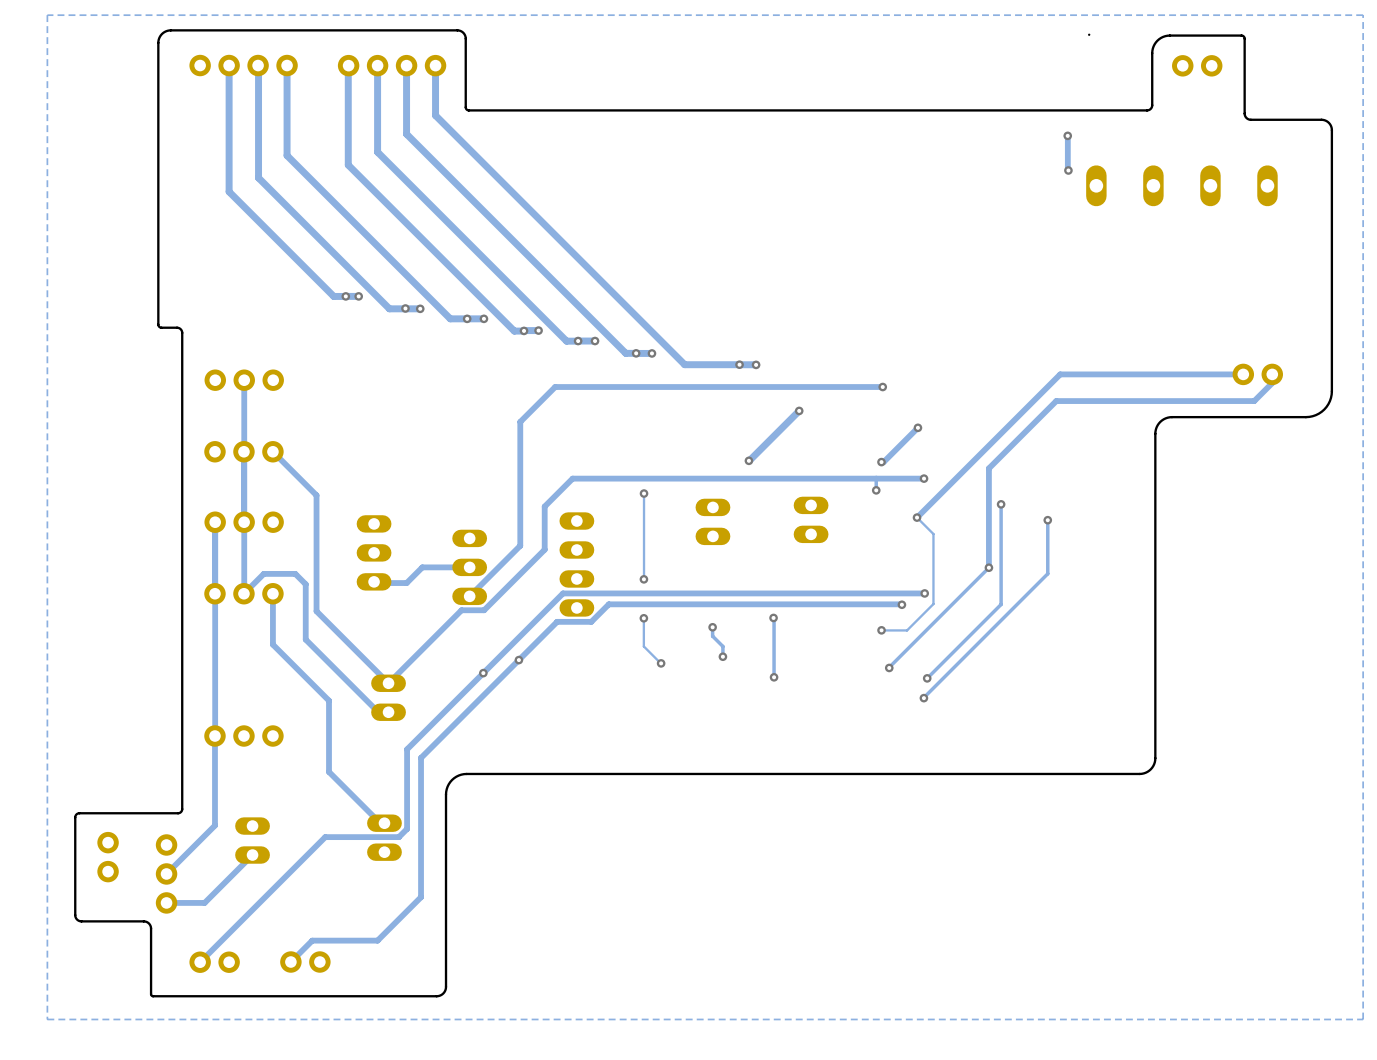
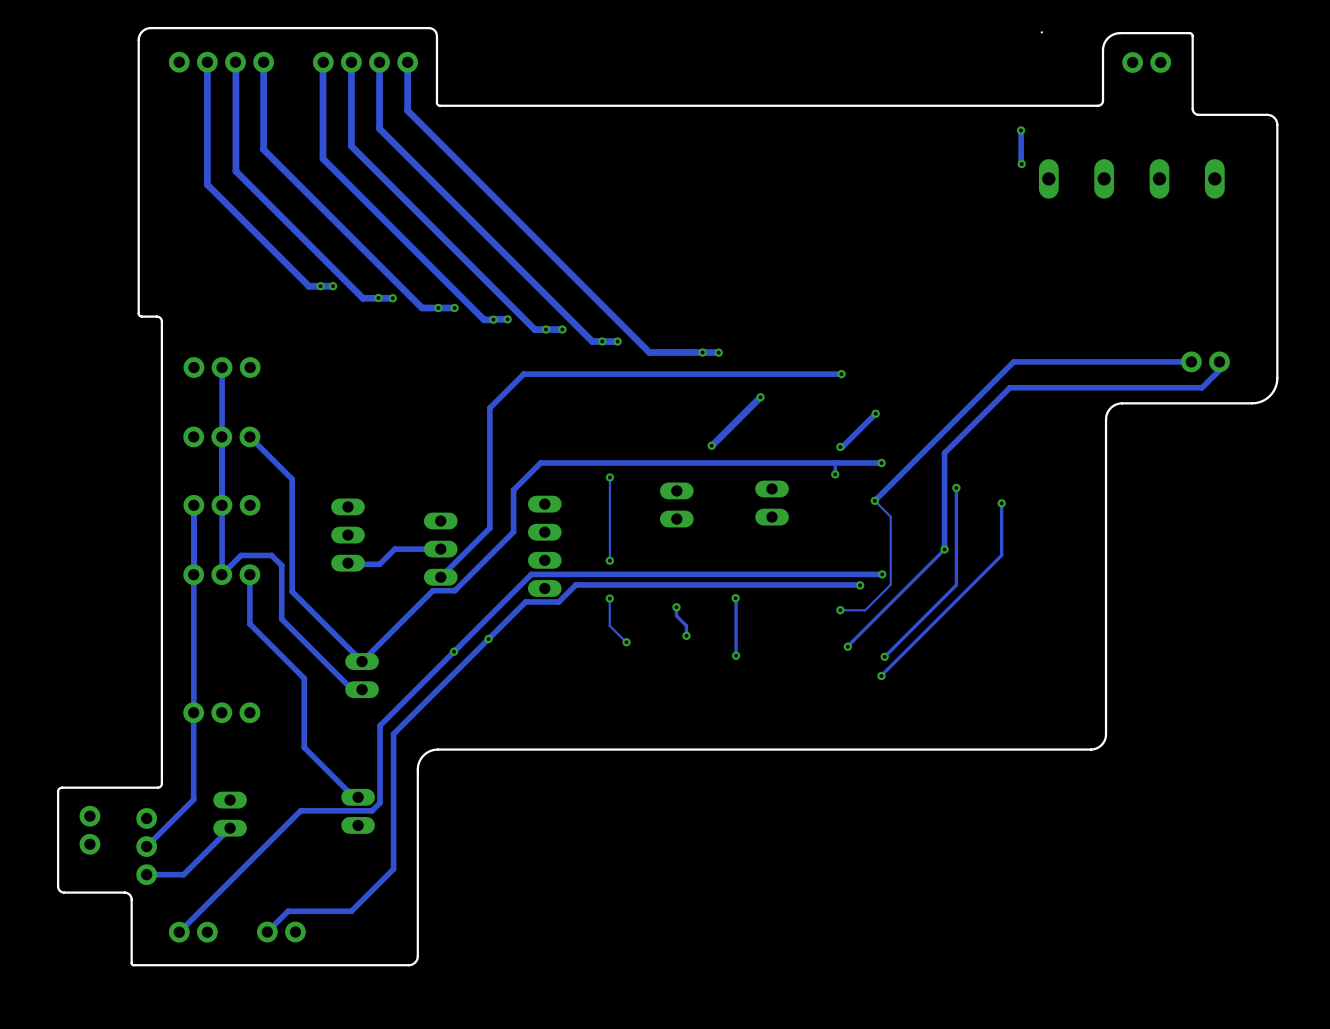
zone outline: (1363, 15) (47, 15) (47, 1019) (1363, 1019) (1363, 15) -> none

